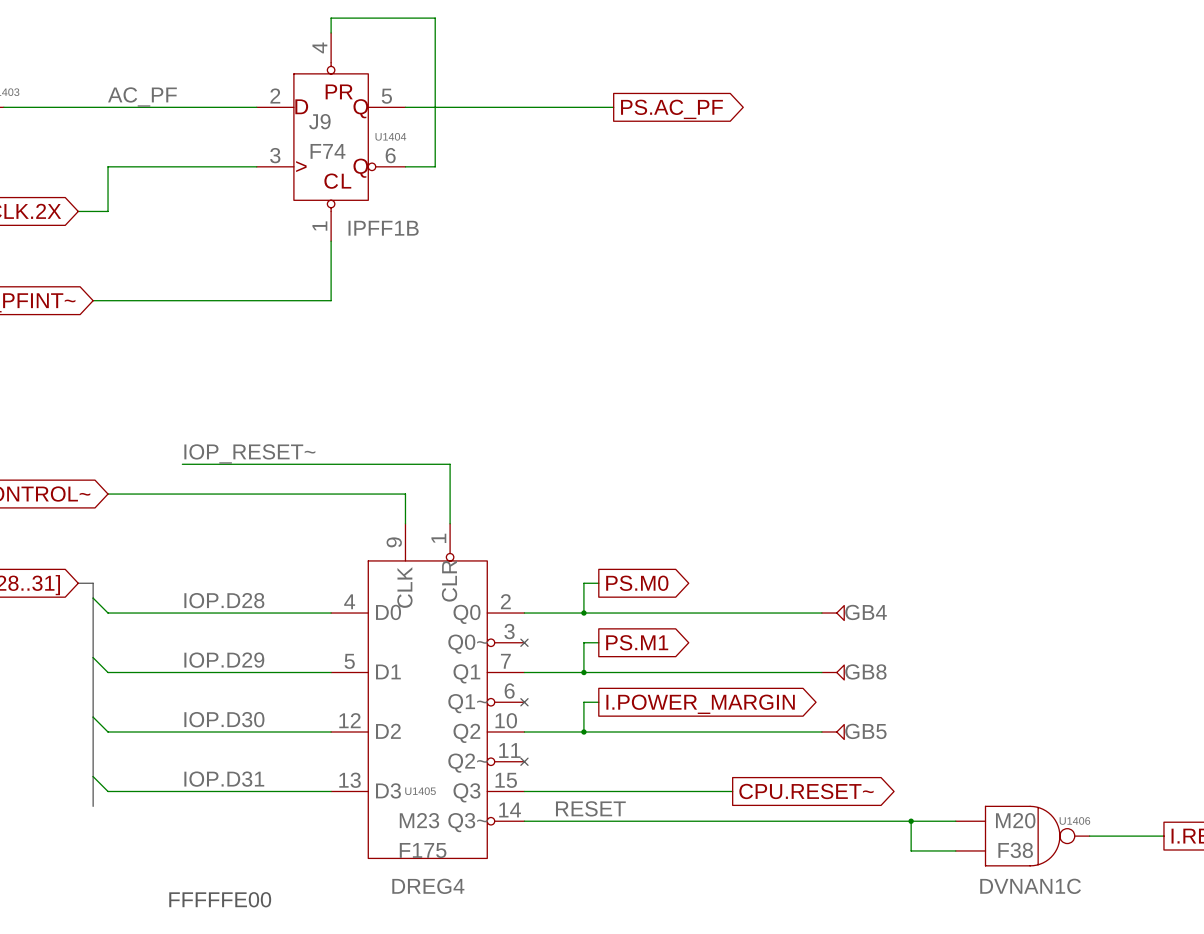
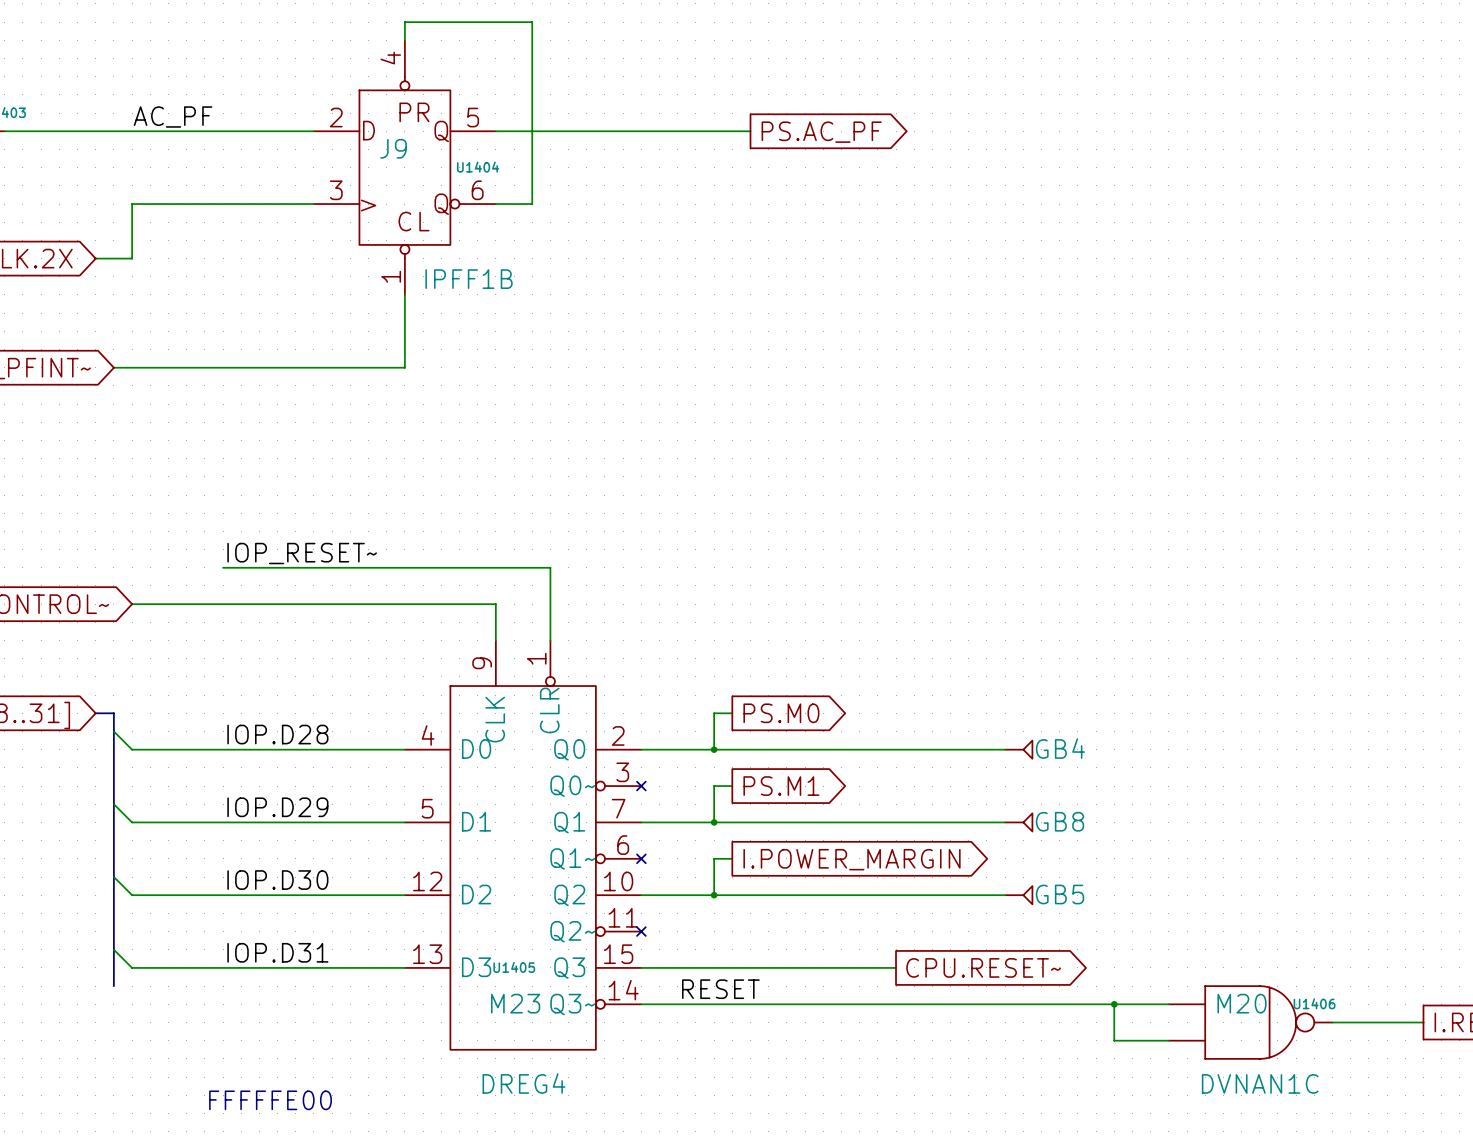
U1404 value: F74 (327, 151) -> none
U1405 value: F175 (423, 850) -> none
U1406 value: F38 (1015, 850) -> none

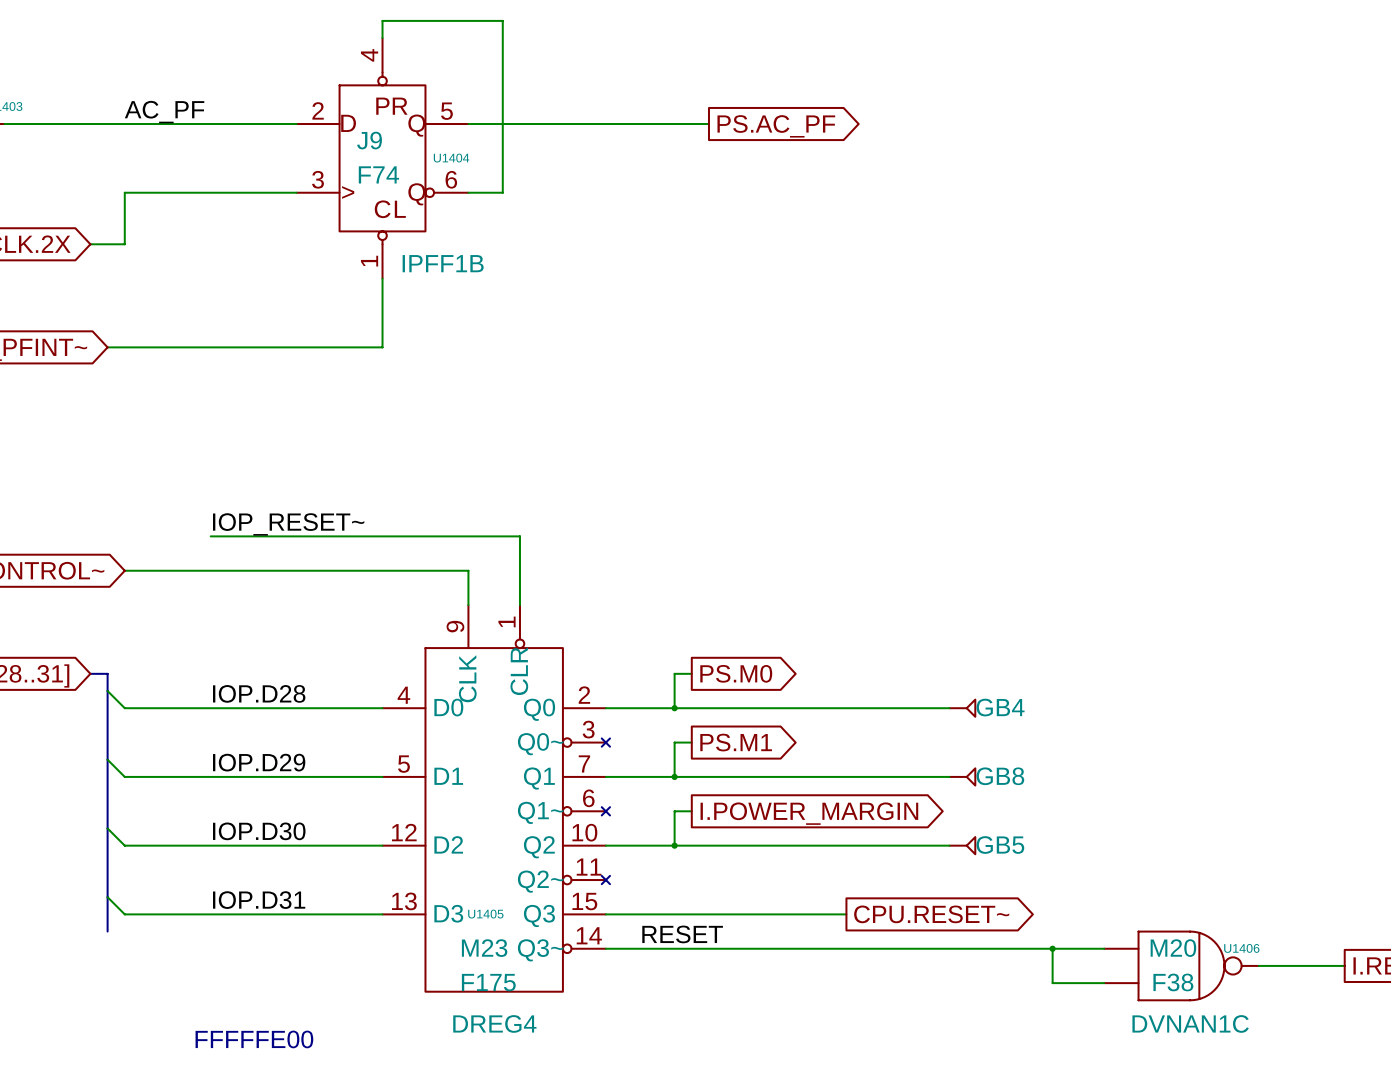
U1404 value: none -> F74 (378, 174)
U1405 value: none -> F175 (488, 982)
U1406 value: none -> F38 (1173, 982)

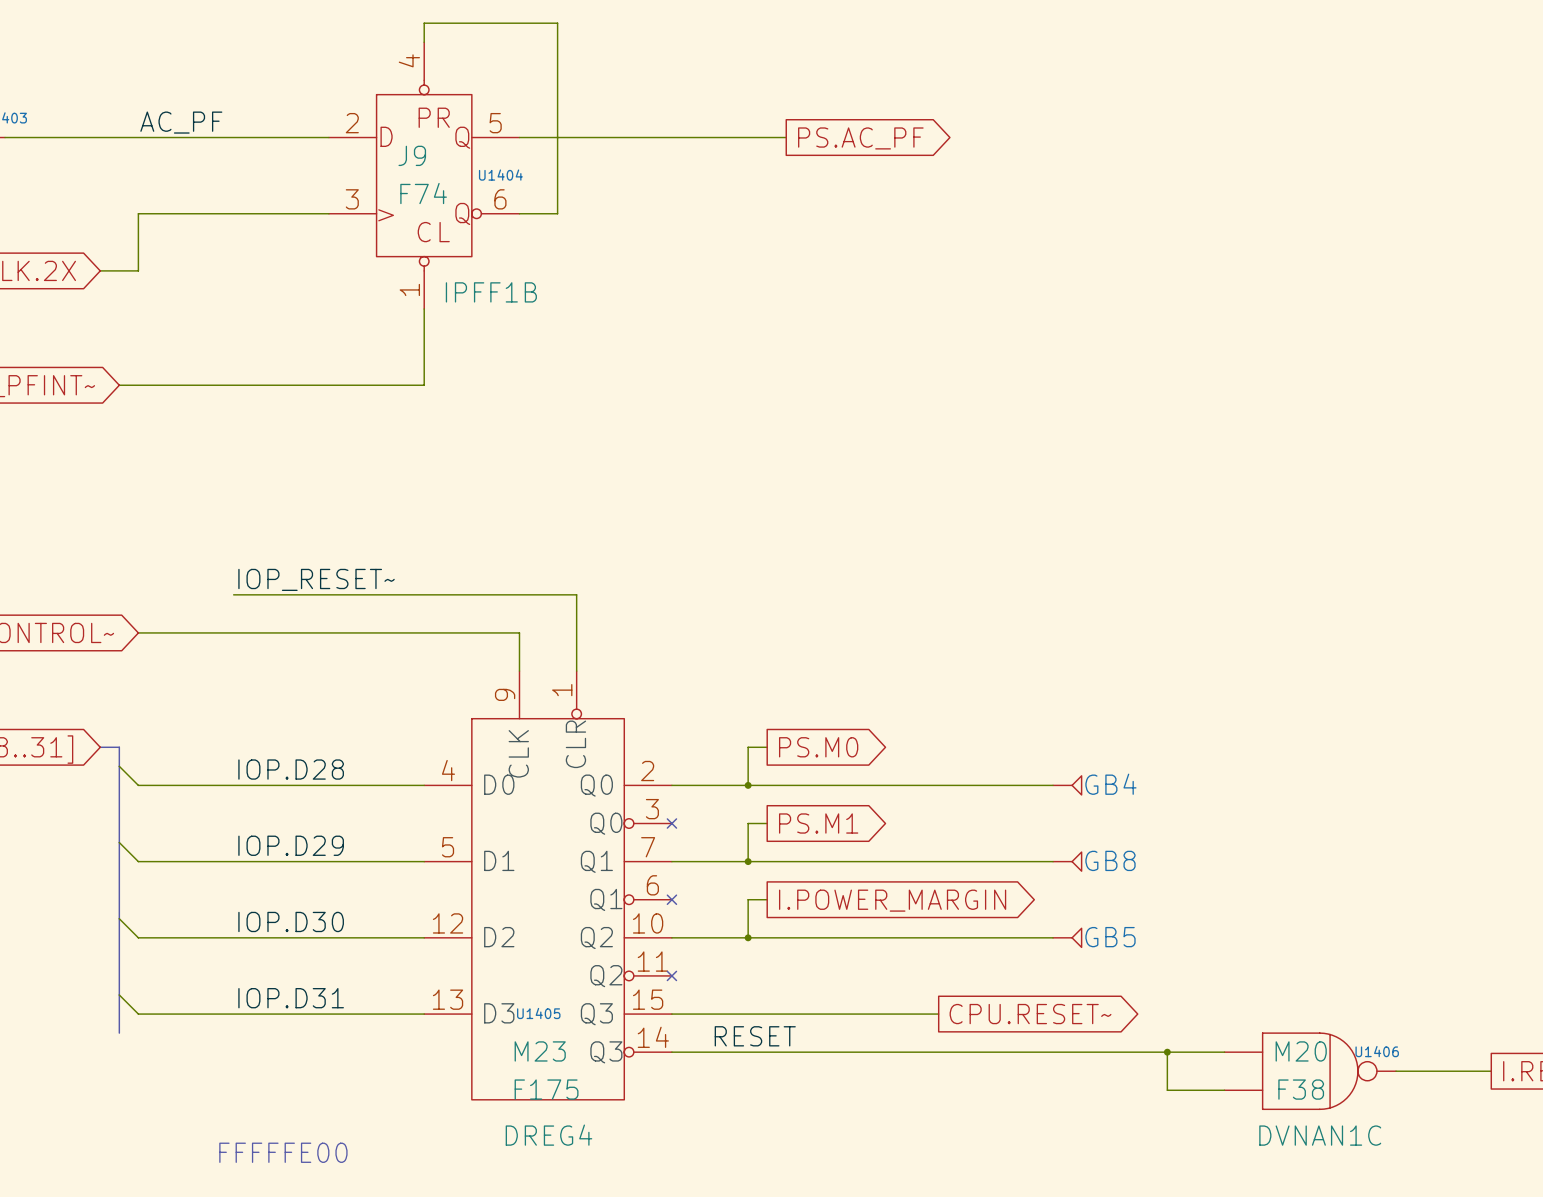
U1405 pin name: Q0~ (540, 744) -> Q0 (606, 823)
U1405 pin name: Q1~ (540, 812) -> Q1 (606, 899)
U1405 pin name: Q2~ (540, 881) -> Q2 (606, 976)
U1405 pin name: Q3~ (540, 950) -> Q3 (606, 1052)

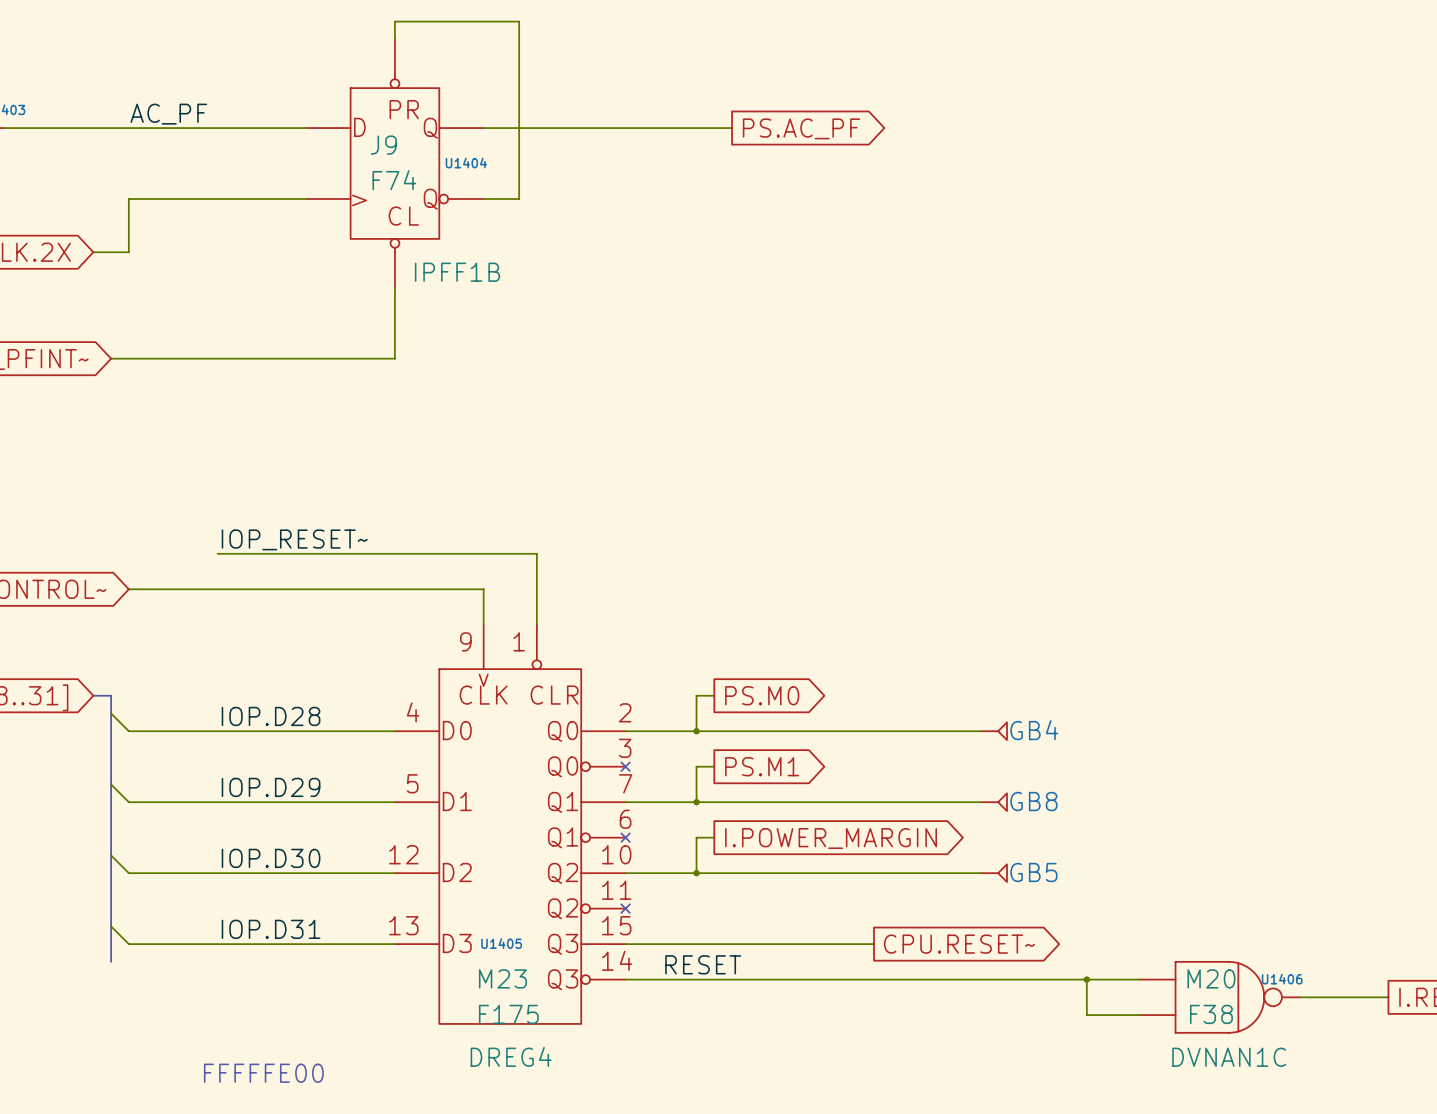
U1404 pin number: 4 (409, 60) -> none
U1404 pin number: 2 (352, 123) -> none
U1404 pin number: 5 (495, 123) -> none
U1404 pin number: 3 (352, 199) -> none
U1404 pin number: 6 (500, 199) -> none
U1404 pin number: 1 (409, 289) -> none
U1405 symbol: [424, 671, 672, 1100] -> [394, 624, 626, 1024]

